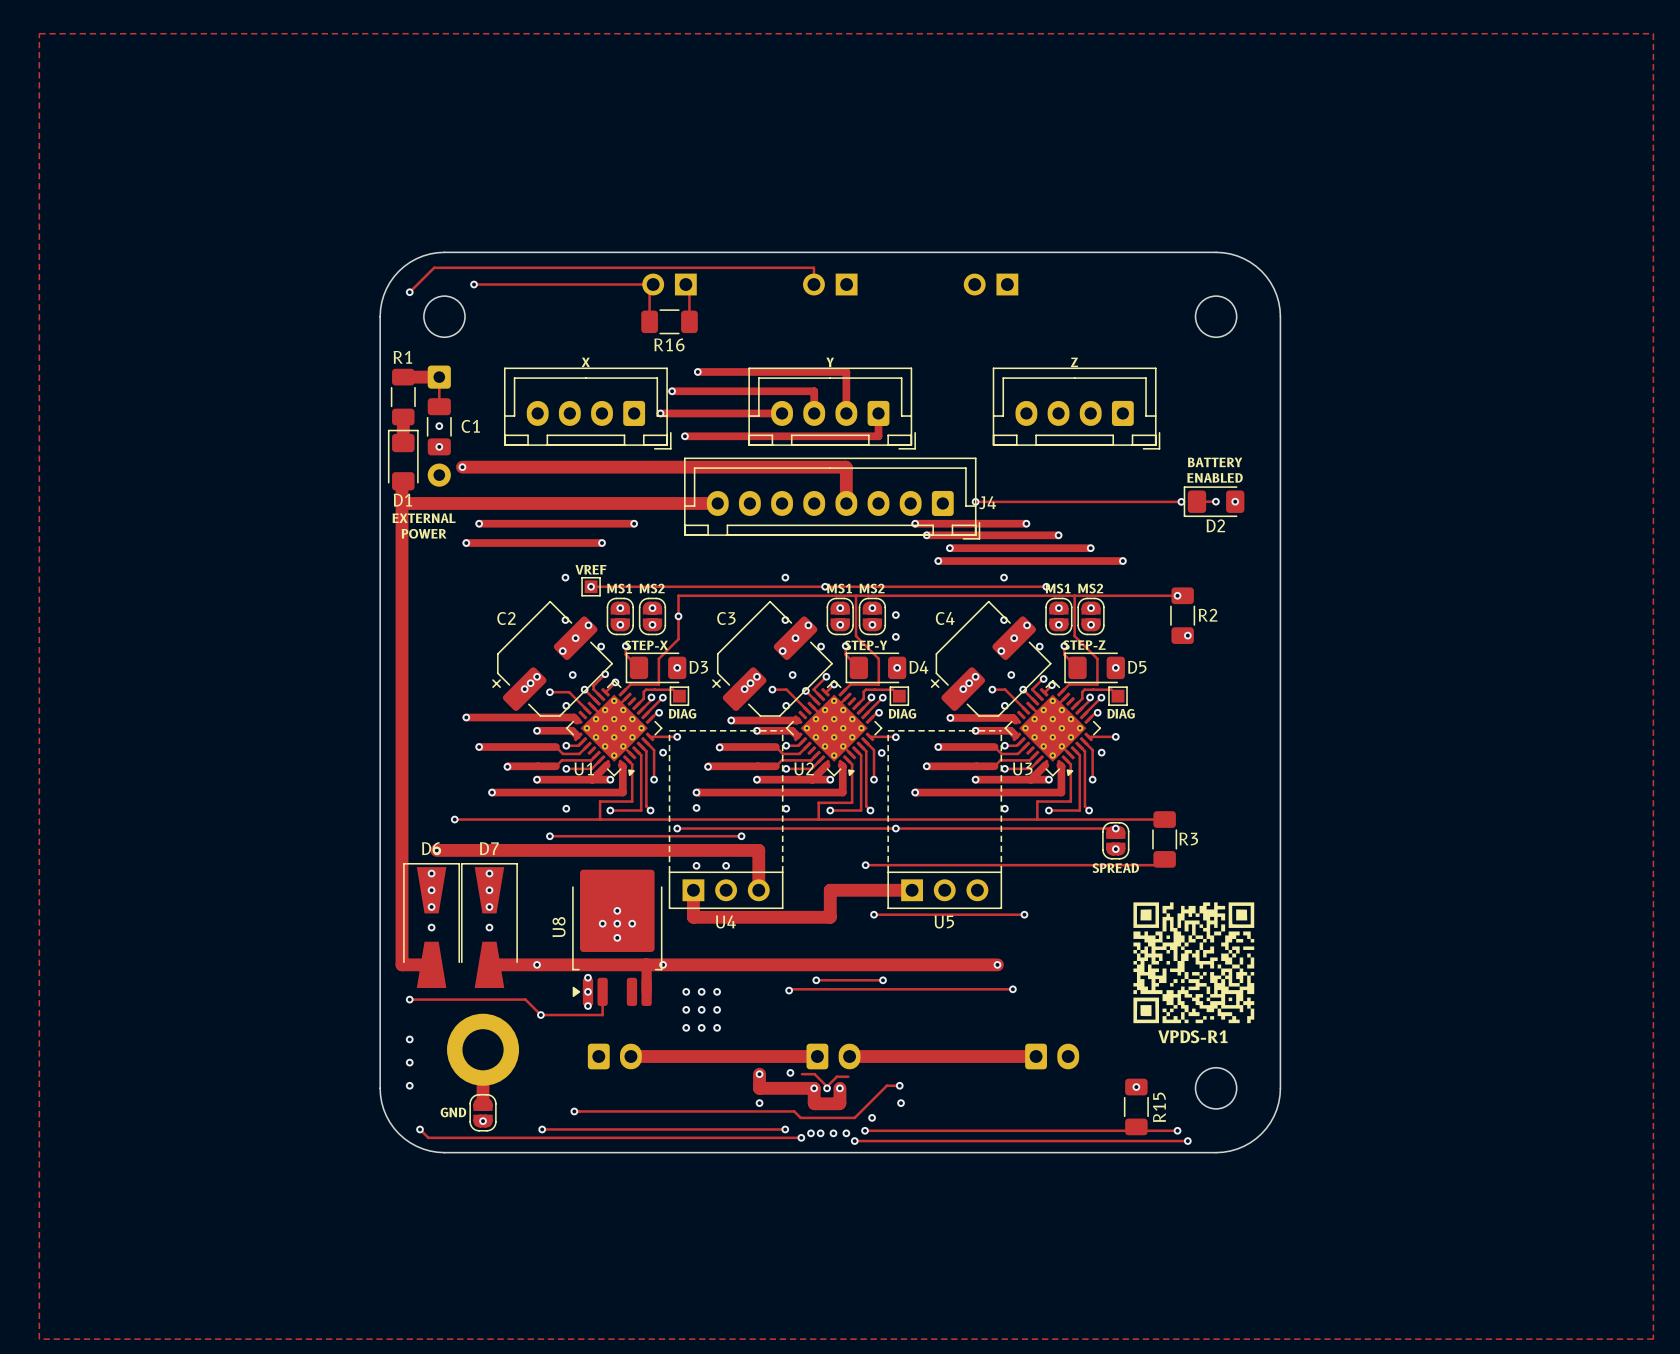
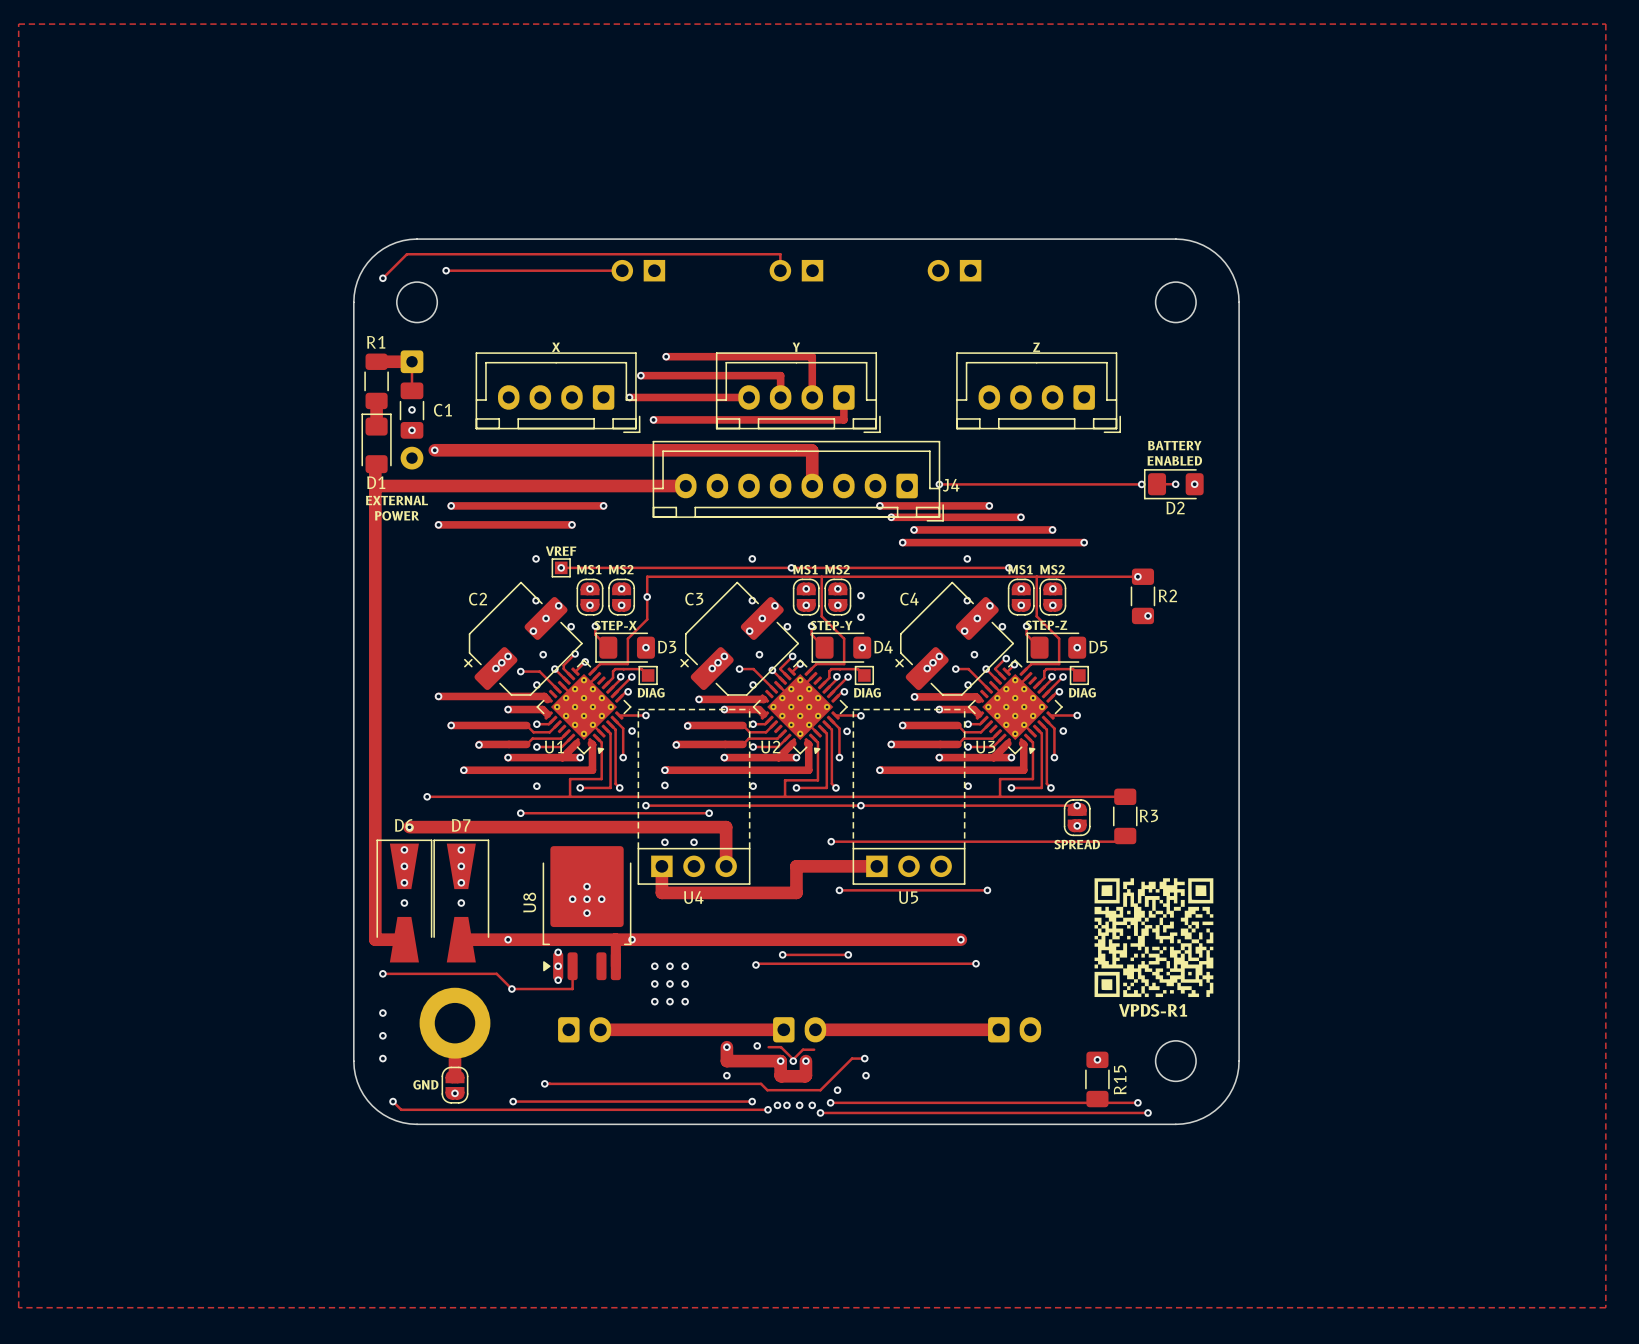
track: (653, 284) (649, 288) (649, 321) -> none
track: (685, 284) (689, 288) (689, 321) -> none
R16: (669, 321) -> none

